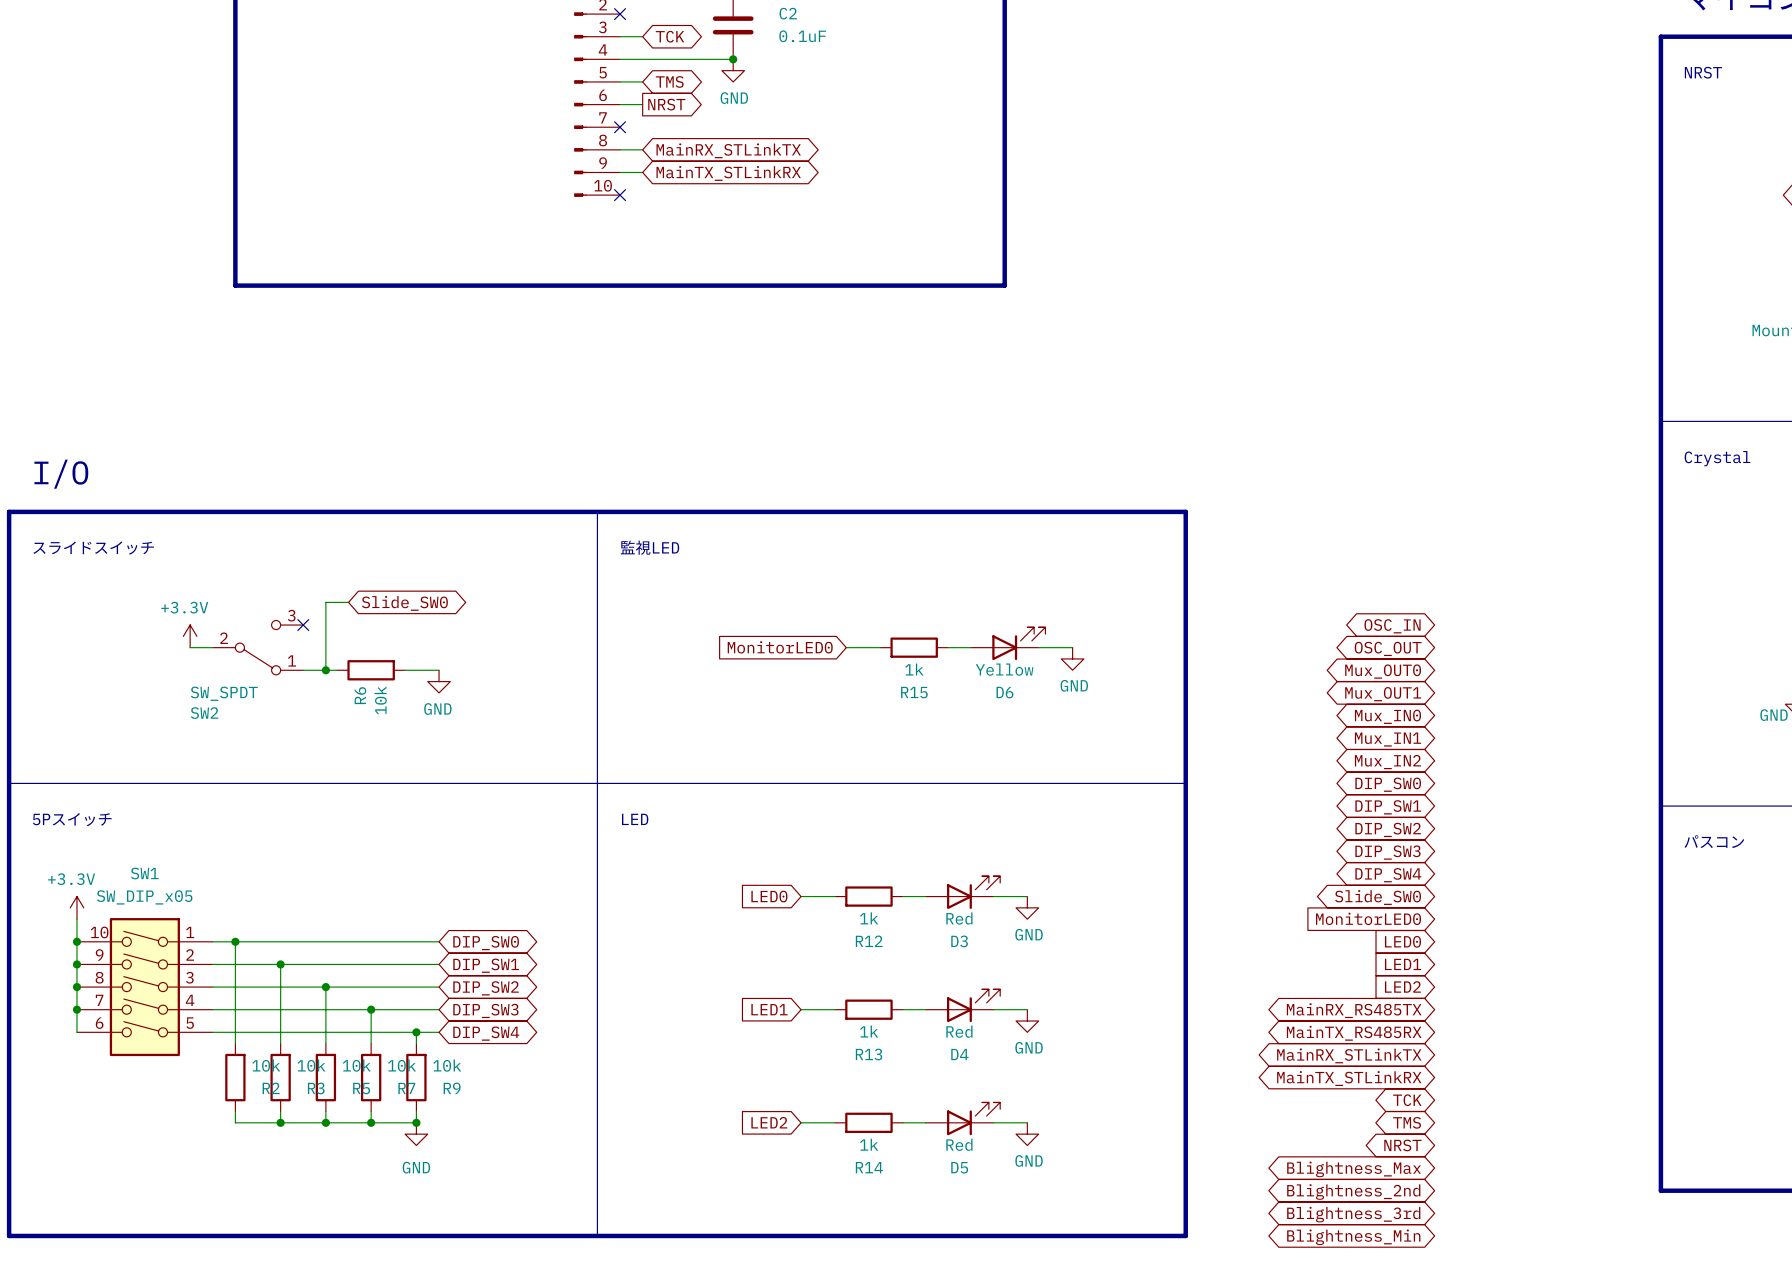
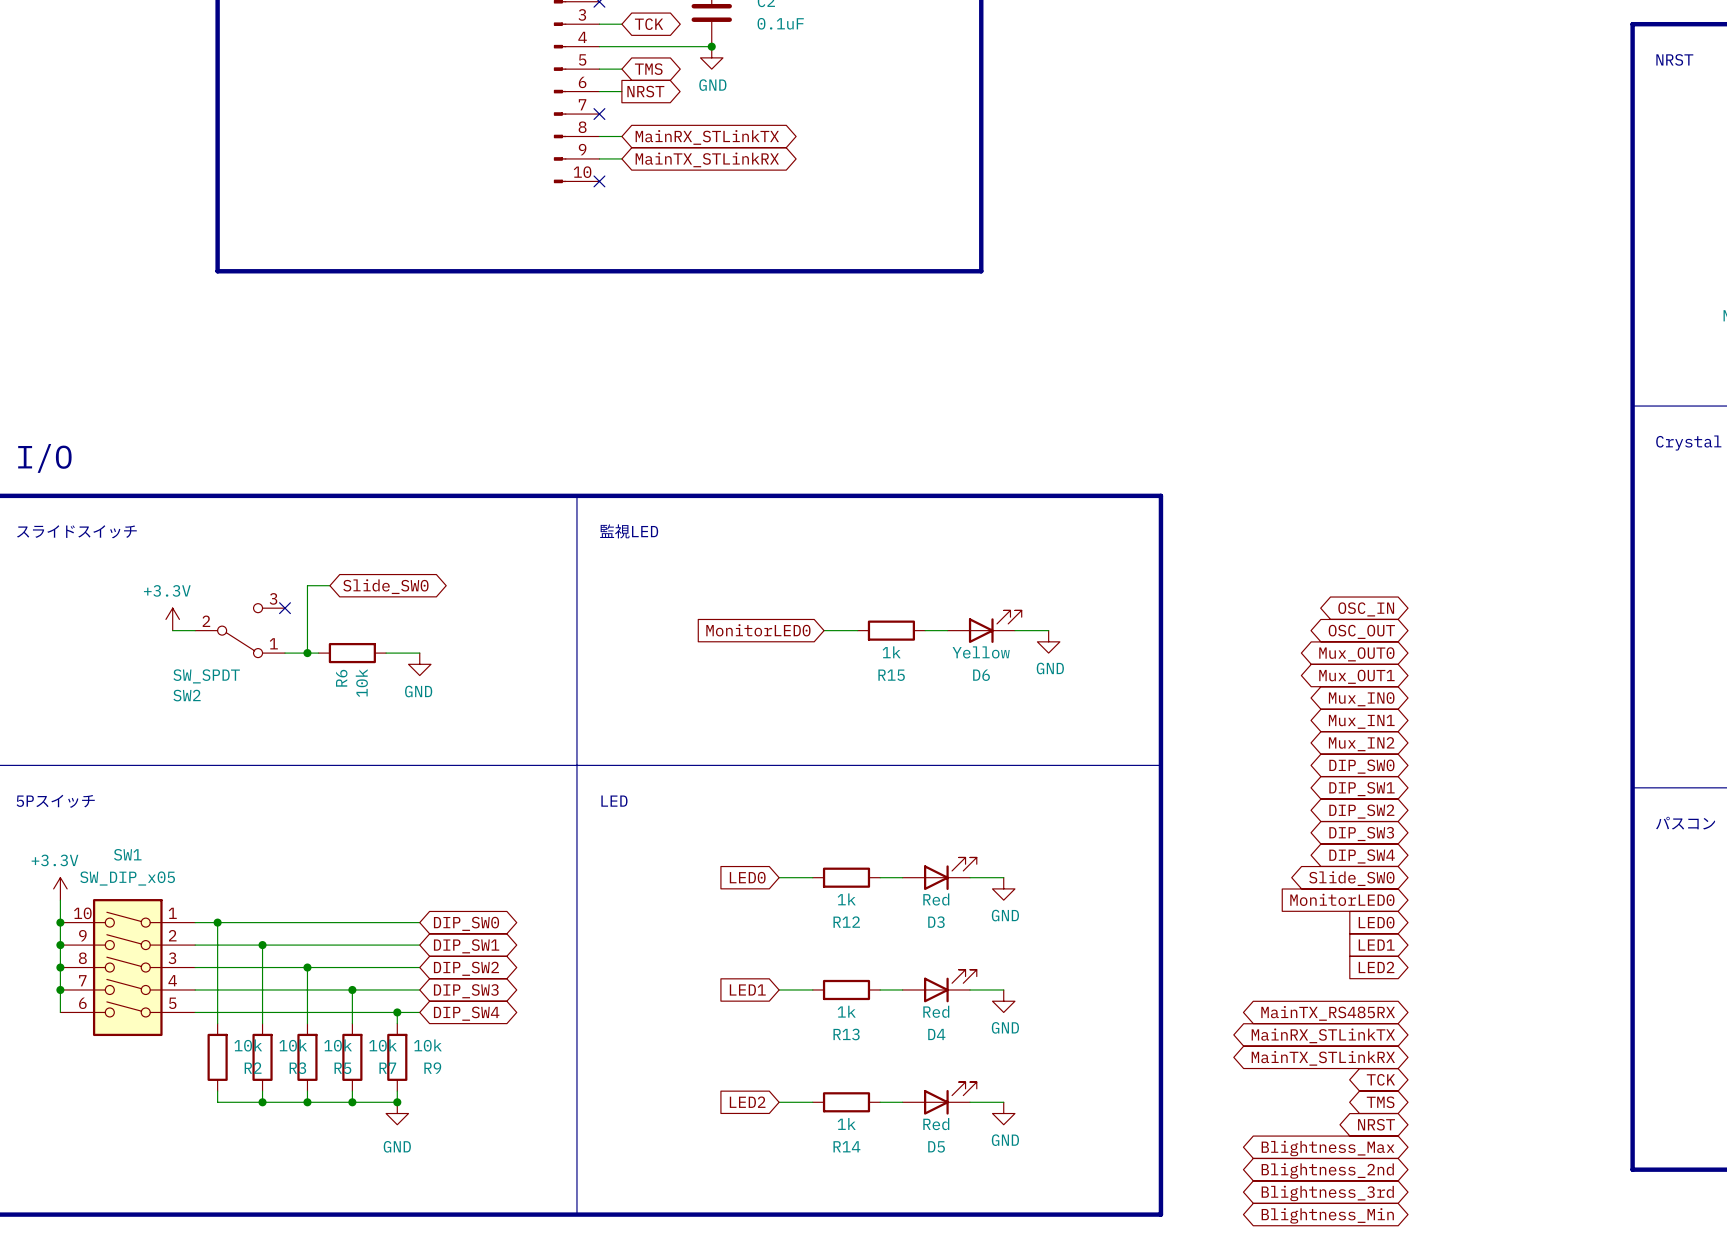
global label: MainRX_RS485TX (1354, 1010) -> none

